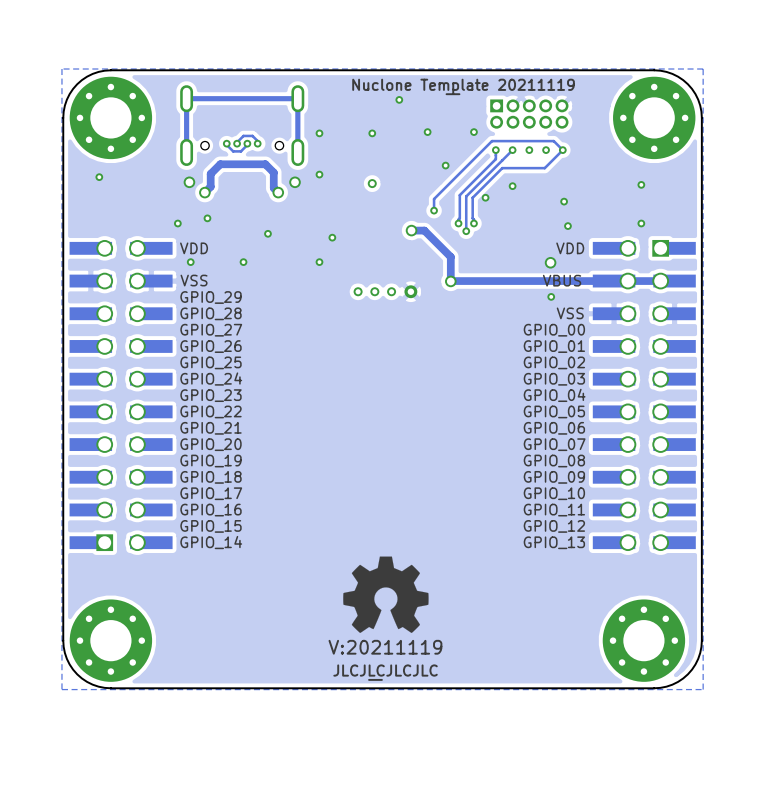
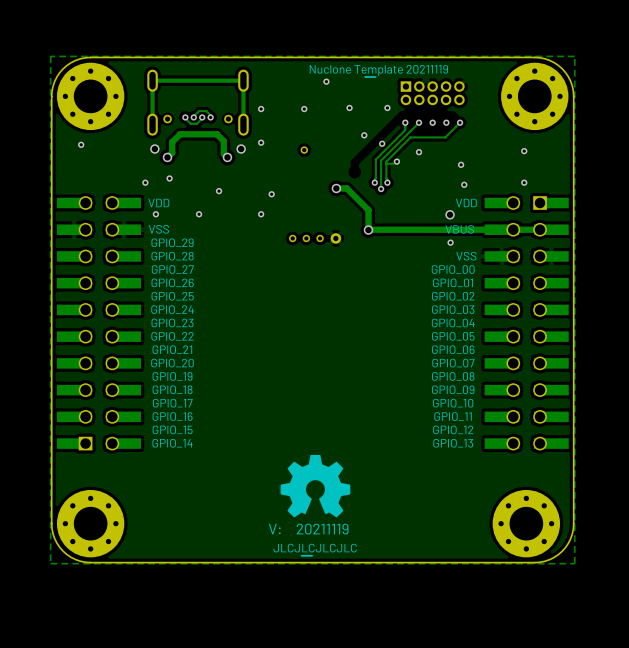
track: (562, 150) (553, 141) (492, 141) (434, 199) (434, 210) -> none
track: none -> (393, 163) (386, 163)
via position: (434, 210) -> (382, 143)

